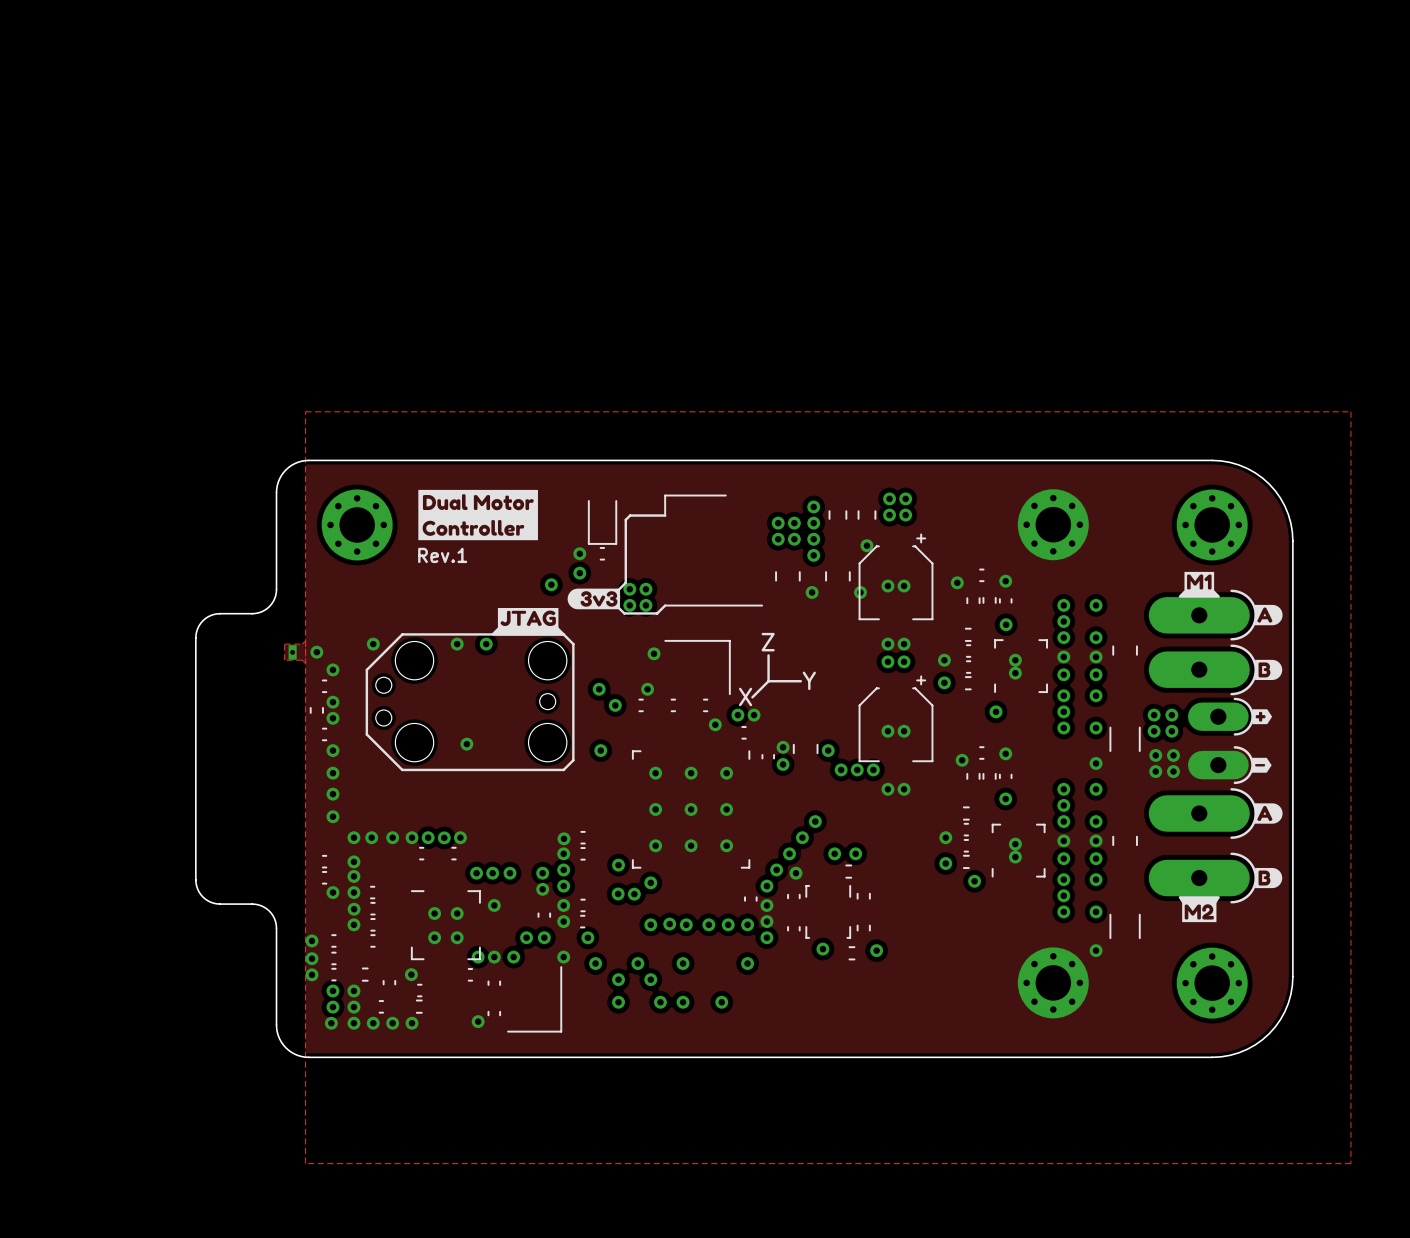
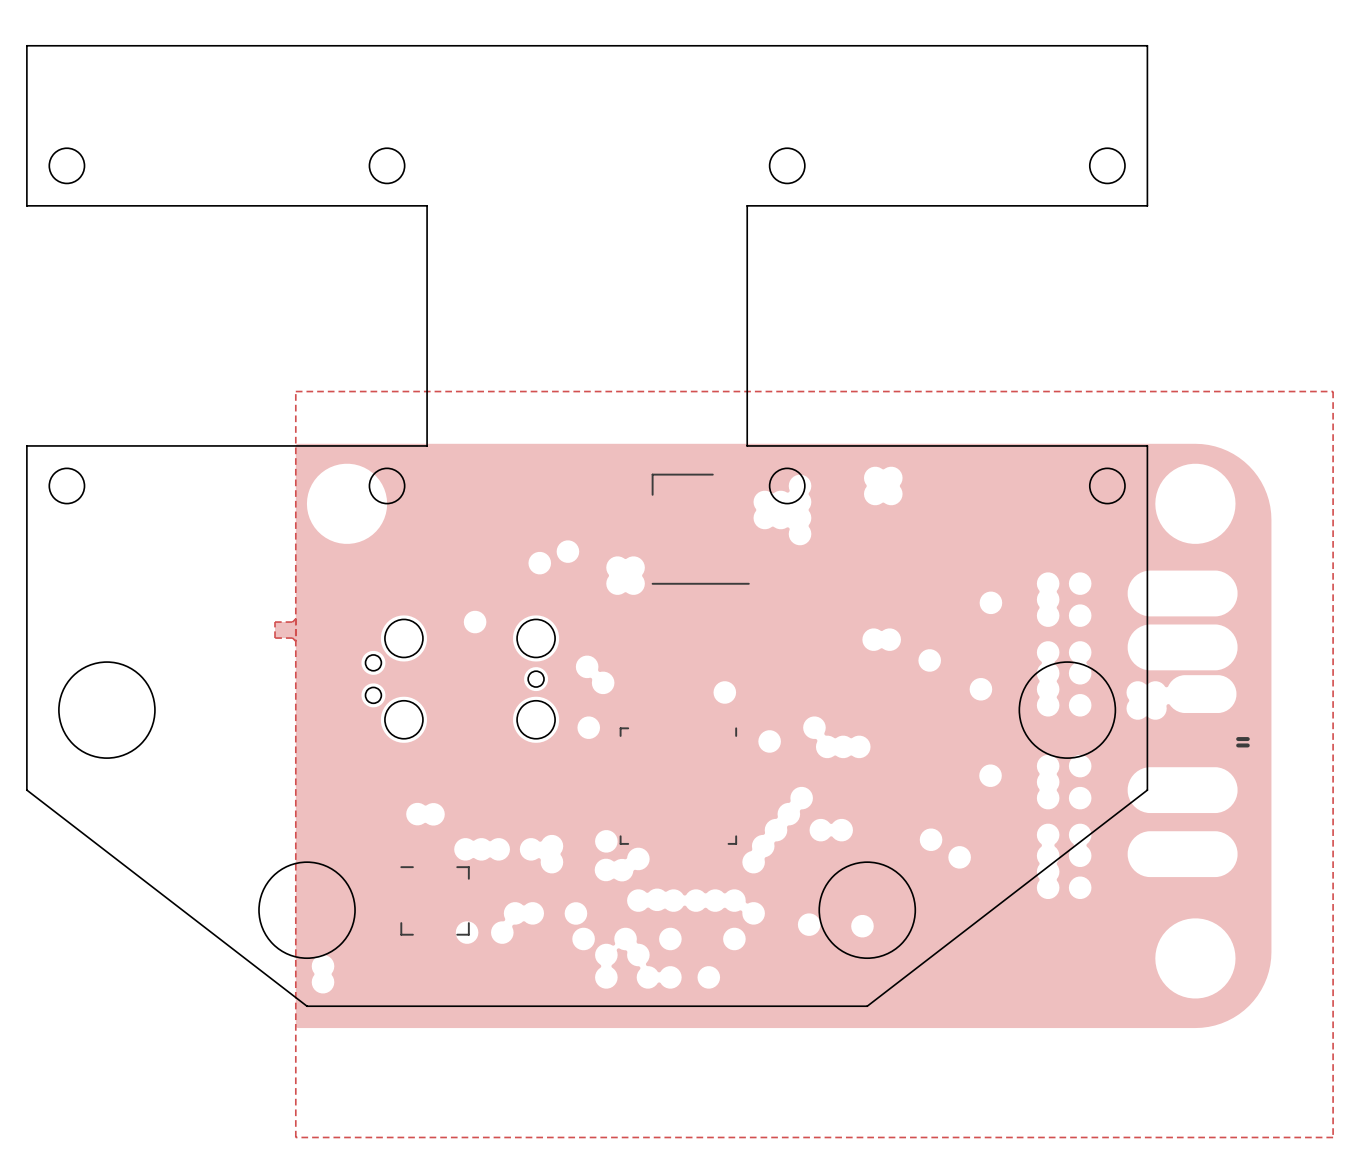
board edge: none -> (26, 45) (26, 205) (427, 205) (427, 445) (26, 445) (26, 790) (307, 1006) (867, 1006) (1147, 790) (1147, 445) (747, 445) (747, 205) (1147, 205) (1147, 45) (26, 45)
round board edge: none -> [48, 147, 86, 185]
round board edge: none -> [368, 147, 406, 185]
round board edge: none -> [768, 147, 806, 185]
round board edge: none -> [1088, 147, 1126, 185]
board edge: (308, 460) (1212, 460) (1230, 462) (1255, 472) (1269, 484) (1280, 498) (1288, 514) (1292, 541) (1292, 976) (1288, 1003) (1280, 1019) (1269, 1033) (1247, 1049) (1230, 1055) (1212, 1057) (308, 1057) (291, 1052) (281, 1042) (276, 1028) (276, 928) (273, 916) (267, 909) (258, 904) (210, 902) (202, 896) (196, 886) (195, 637) (199, 625) (210, 615) (258, 612) (267, 608) (273, 601) (276, 589) (277, 485) (281, 475) (288, 467) (298, 462) (308, 460) -> none
round board edge: none -> [48, 467, 86, 505]
round board edge: none -> [368, 467, 406, 505]
round board edge: none -> [768, 467, 806, 505]
round board edge: none -> [1088, 467, 1126, 505]
drawing: [418, 489, 538, 541] -> none
via: (889, 498) -> none
via: (905, 498) -> none
via: (813, 506) -> none
line: (665, 515) (630, 515) (625, 519) (625, 582) (618, 590) -> none
part: (837, 515) -> none
part: (866, 515) -> none
via: (889, 515) -> none
via: (905, 515) -> none
part: (602, 522) -> none
via: (778, 523) -> none
via: (794, 523) -> none
via: (813, 523) -> none
part: (357, 524) -> none
part: (1053, 524) -> none
part: (1212, 524) -> none
via: (778, 539) -> none
via: (794, 539) -> none
via: (813, 539) -> none
via: (866, 545) -> none
via: (579, 553) -> none
part: (602, 553) -> none
text: Rev.1 (442, 555) -> none
via: (813, 555) -> none
drawing: [1178, 571, 1220, 598] -> none
via: (579, 573) -> none
part: (981, 575) -> none
part: (787, 576) -> none
part: (837, 576) -> none
part: (896, 576) -> none
via: (1005, 581) -> none
via: (957, 582) -> none
via: (551, 584) -> none
via: (887, 586) -> none
via: (904, 586) -> none
drawing: [491, 588, 621, 636] -> none
via: (629, 589) -> none
via: (645, 589) -> none
line: (1231, 590) (1240, 592) (1248, 597) (1253, 605) (1255, 615) (1253, 624) (1248, 632) (1240, 637) (1231, 639) -> none
via: (812, 592) -> none
via: (860, 592) -> none
part: (973, 600) -> none
part: (989, 600) -> none
part: (1005, 600) -> none
drawing: [1254, 604, 1283, 626] -> none
via: (629, 605) -> none
via: (645, 605) -> none
line: (665, 605) (657, 613) -> none
via: (1063, 605) -> none
via: (1096, 605) -> none
line: (619, 608) (624, 613) (657, 613) -> none
via: (1063, 621) -> none
via: (1006, 624) -> none
line: (402, 634) (563, 634) (573, 644) (573, 760) (563, 769) (402, 769) (366, 734) (366, 669) (402, 634) -> none
part: (968, 634) -> none
via: (1063, 637) -> none
via: (1096, 637) -> none
text: Z (768, 642) -> none
part: (1199, 642) -> none
via: (373, 644) -> none
via: (457, 644) -> none
via: (486, 644) -> none
via: (887, 644) -> none
via: (904, 644) -> none
line: (1231, 645) (1240, 647) (1248, 652) (1253, 660) (1255, 669) (1253, 679) (1248, 687) (1240, 692) (1231, 694) -> none
part: (1125, 650) -> none
part: (968, 651) -> none
part: (292, 652) -> none
via: (316, 652) -> none
via: (654, 653) -> none
line: (768, 655) (768, 681) -> none
via: (1063, 657) -> none
via: (1096, 657) -> none
drawing: [1255, 659, 1283, 680] -> none
via: (944, 660) -> none
via: (1015, 660) -> none
via: (887, 661) -> none
via: (904, 661) -> none
part: (1021, 666) -> none
part: (697, 667) -> none
part: (968, 667) -> none
via: (332, 669) -> none
via: (1015, 673) -> none
via: (1063, 674) -> none
via: (1096, 674) -> none
text: Y (809, 680) -> none
line: (768, 681) (800, 681) -> none
line: (768, 681) (752, 697) -> none
via: (944, 682) -> none
round board edge: none -> [58, 661, 156, 759]
part: (968, 683) -> none
round board edge: none -> [1018, 661, 1117, 759]
part: (324, 686) -> none
via: (599, 689) -> none
via: (647, 689) -> none
via: (1063, 695) -> none
via: (1096, 695) -> none
text: X (745, 696) -> none
line: (1234, 698) (1246, 703) (1250, 708) (1252, 716) (1248, 728) (1243, 732) (1234, 734) -> none
via: (332, 702) -> none
via: (615, 705) -> none
part: (641, 705) -> none
part: (673, 705) -> none
part: (705, 705) -> none
drawing: [1252, 709, 1273, 725] -> none
part: (316, 710) -> none
via: (996, 711) -> none
via: (1063, 711) -> none
via: (737, 715) -> none
via: (754, 715) -> none
via: (1154, 715) -> none
via: (1171, 715) -> none
via: (332, 718) -> none
part: (896, 718) -> none
via: (715, 724) -> none
via: (1063, 728) -> none
via: (1096, 728) -> none
via: (887, 731) -> none
via: (904, 731) -> none
via: (1154, 731) -> none
via: (1171, 731) -> none
part: (744, 732) -> none
part: (324, 734) -> none
part: (1125, 739) -> none
part: (1218, 740) -> none
via: (466, 744) -> none
via: (783, 747) -> none
line: (1234, 747) (1247, 752) (1252, 765) (1247, 777) (1234, 782) -> none
part: (805, 748) -> none
via: (332, 750) -> none
via: (600, 750) -> none
via: (828, 750) -> none
part: (981, 753) -> none
via: (1005, 753) -> none
via: (1155, 755) -> none
via: (1173, 755) -> none
part: (768, 756) -> none
drawing: [1251, 757, 1272, 773] -> none
via: (962, 760) -> none
via: (1096, 763) -> none
via: (783, 764) -> none
via: (841, 769) -> none
via: (857, 769) -> none
via: (873, 769) -> none
via: (1155, 771) -> none
via: (1173, 771) -> none
via: (332, 773) -> none
via: (655, 773) -> none
via: (691, 773) -> none
via: (726, 773) -> none
part: (973, 776) -> none
part: (989, 776) -> none
part: (1005, 776) -> none
via: (887, 789) -> none
via: (904, 789) -> none
via: (1063, 789) -> none
via: (1096, 789) -> none
line: (1231, 789) (1240, 791) (1248, 796) (1253, 804) (1255, 813) (1253, 822) (1248, 830) (1240, 835) (1231, 837) -> none
via: (332, 794) -> none
via: (1005, 798) -> none
drawing: [1254, 803, 1283, 824] -> none
via: (1063, 805) -> none
via: (655, 809) -> none
via: (691, 809) -> none
via: (726, 809) -> none
part: (966, 813) -> none
via: (332, 816) -> none
via: (815, 821) -> none
via: (1063, 821) -> none
via: (1096, 821) -> none
part: (966, 829) -> none
via: (353, 837) -> none
via: (371, 837) -> none
via: (392, 837) -> none
via: (412, 837) -> none
via: (428, 837) -> none
via: (444, 837) -> none
via: (460, 837) -> none
part: (583, 837) -> none
via: (802, 837) -> none
via: (945, 837) -> none
via: (563, 838) -> none
via: (1063, 840) -> none
via: (1096, 840) -> none
part: (1125, 840) -> none
via: (1015, 844) -> none
via: (655, 845) -> none
via: (691, 845) -> none
via: (726, 845) -> none
part: (966, 845) -> none
part: (1199, 845) -> none
part: (1018, 850) -> none
part: (421, 853) -> none
part: (453, 853) -> none
via: (563, 853) -> none
part: (583, 853) -> none
via: (789, 853) -> none
via: (834, 853) -> none
via: (855, 853) -> none
line: (1231, 853) (1240, 855) (1248, 860) (1253, 868) (1255, 878) (1253, 887) (1248, 895) (1240, 900) (1231, 902) -> none
via: (1015, 857) -> none
via: (1063, 858) -> none
via: (1096, 858) -> none
part: (324, 861) -> none
via: (353, 861) -> none
part: (966, 861) -> none
via: (945, 863) -> none
via: (618, 865) -> none
drawing: [1255, 867, 1283, 889] -> none
via: (563, 869) -> none
via: (776, 869) -> none
part: (848, 871) -> none
via: (476, 873) -> none
via: (492, 873) -> none
via: (510, 873) -> none
via: (542, 873) -> none
via: (795, 873) -> none
via: (353, 876) -> none
part: (324, 877) -> none
via: (1063, 879) -> none
via: (1096, 879) -> none
via: (974, 881) -> none
via: (650, 882) -> none
round board edge: none -> [258, 861, 356, 960]
round board edge: none -> [818, 861, 917, 960]
via: (563, 886) -> none
via: (766, 886) -> none
via: (542, 889) -> none
via: (332, 892) -> none
via: (353, 892) -> none
part: (372, 892) -> none
via: (618, 893) -> none
via: (634, 894) -> none
via: (1063, 895) -> none
part: (793, 896) -> none
part: (863, 896) -> none
drawing: [1178, 896, 1220, 923] -> none
part: (750, 899) -> none
via: (494, 905) -> none
via: (563, 905) -> none
part: (583, 905) -> none
via: (766, 905) -> none
part: (372, 908) -> none
via: (354, 909) -> none
part: (828, 911) -> none
via: (1063, 911) -> none
via: (1096, 911) -> none
via: (434, 913) -> none
via: (457, 913) -> none
part: (544, 915) -> none
via: (563, 921) -> none
part: (582, 921) -> none
via: (766, 921) -> none
via: (353, 924) -> none
part: (372, 924) -> none
via: (650, 924) -> none
via: (669, 924) -> none
via: (686, 924) -> none
via: (708, 924) -> none
via: (728, 924) -> none
via: (747, 924) -> none
part: (1125, 926) -> none
part: (793, 928) -> none
part: (863, 928) -> none
via: (434, 937) -> none
via: (457, 937) -> none
via: (526, 937) -> none
via: (544, 937) -> none
via: (587, 937) -> none
via: (766, 937) -> none
via: (312, 940) -> none
part: (333, 940) -> none
part: (372, 940) -> none
via: (822, 949) -> none
via: (876, 950) -> none
via: (1096, 950) -> none
part: (851, 953) -> none
via: (478, 957) -> none
via: (494, 957) -> none
via: (513, 957) -> none
via: (563, 957) -> none
via: (312, 958) -> none
part: (333, 958) -> none
via: (595, 963) -> none
via: (637, 963) -> none
via: (683, 963) -> none
via: (747, 963) -> none
via: (312, 974) -> none
part: (333, 974) -> none
part: (365, 974) -> none
via: (411, 974) -> none
part: (470, 974) -> none
via: (618, 979) -> none
via: (650, 979) -> none
part: (389, 982) -> none
part: (1053, 982) -> none
part: (494, 983) -> none
part: (1212, 983) -> none
via: (332, 990) -> none
via: (353, 990) -> none
part: (419, 990) -> none
part: (534, 999) -> none
via: (618, 1002) -> none
via: (660, 1002) -> none
via: (683, 1002) -> none
via: (721, 1002) -> none
part: (381, 1006) -> none
part: (419, 1006) -> none
via: (332, 1007) -> none
via: (353, 1007) -> none
part: (494, 1013) -> none
via: (478, 1021) -> none
via: (331, 1023) -> none
via: (353, 1023) -> none
via: (373, 1023) -> none
via: (392, 1023) -> none
via: (412, 1023) -> none

